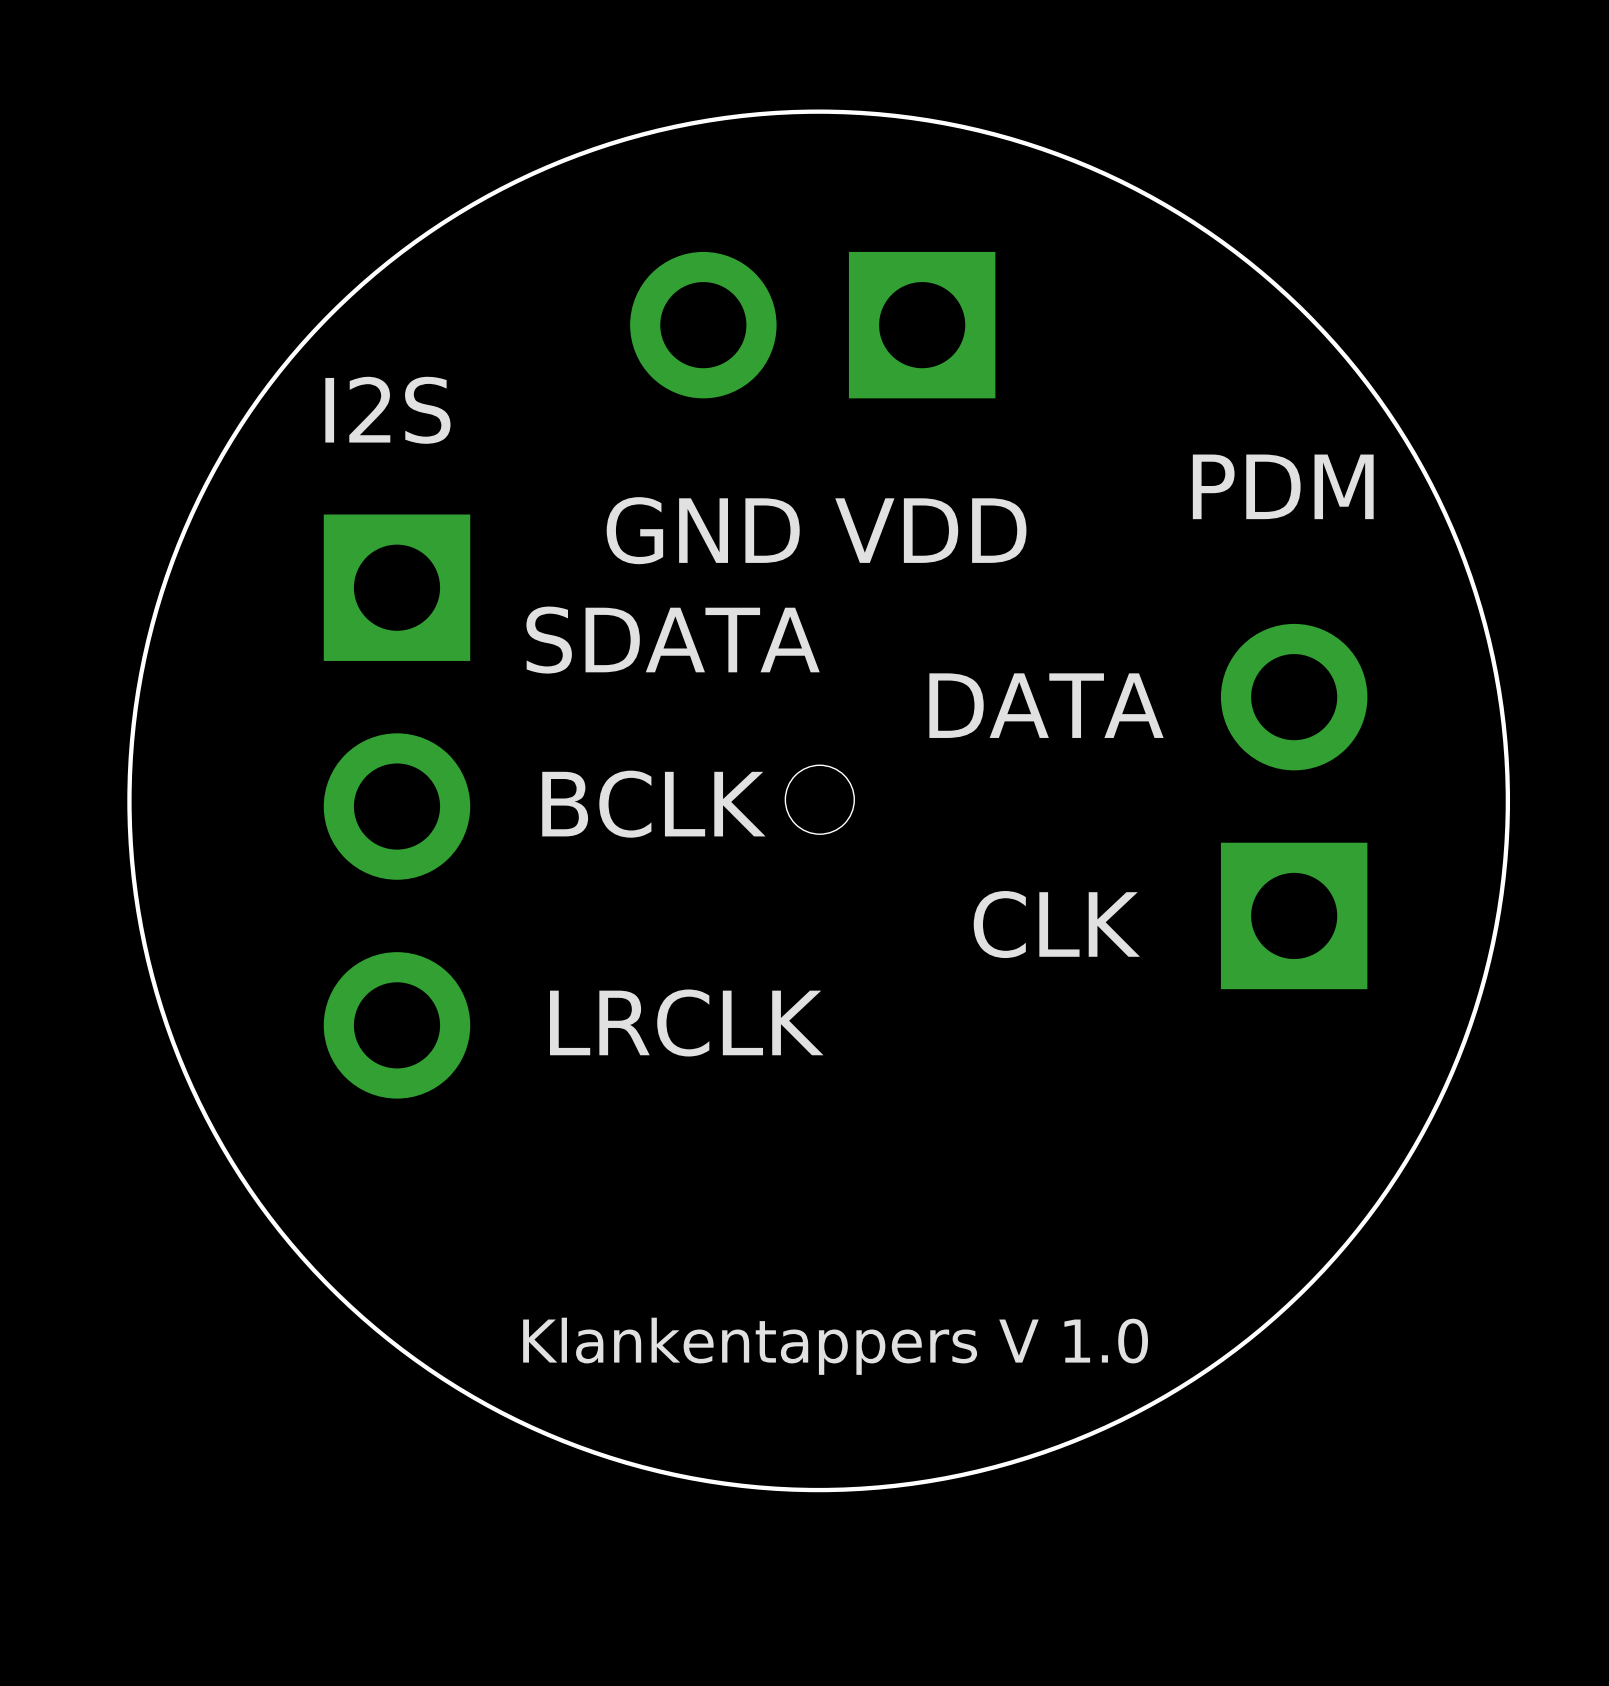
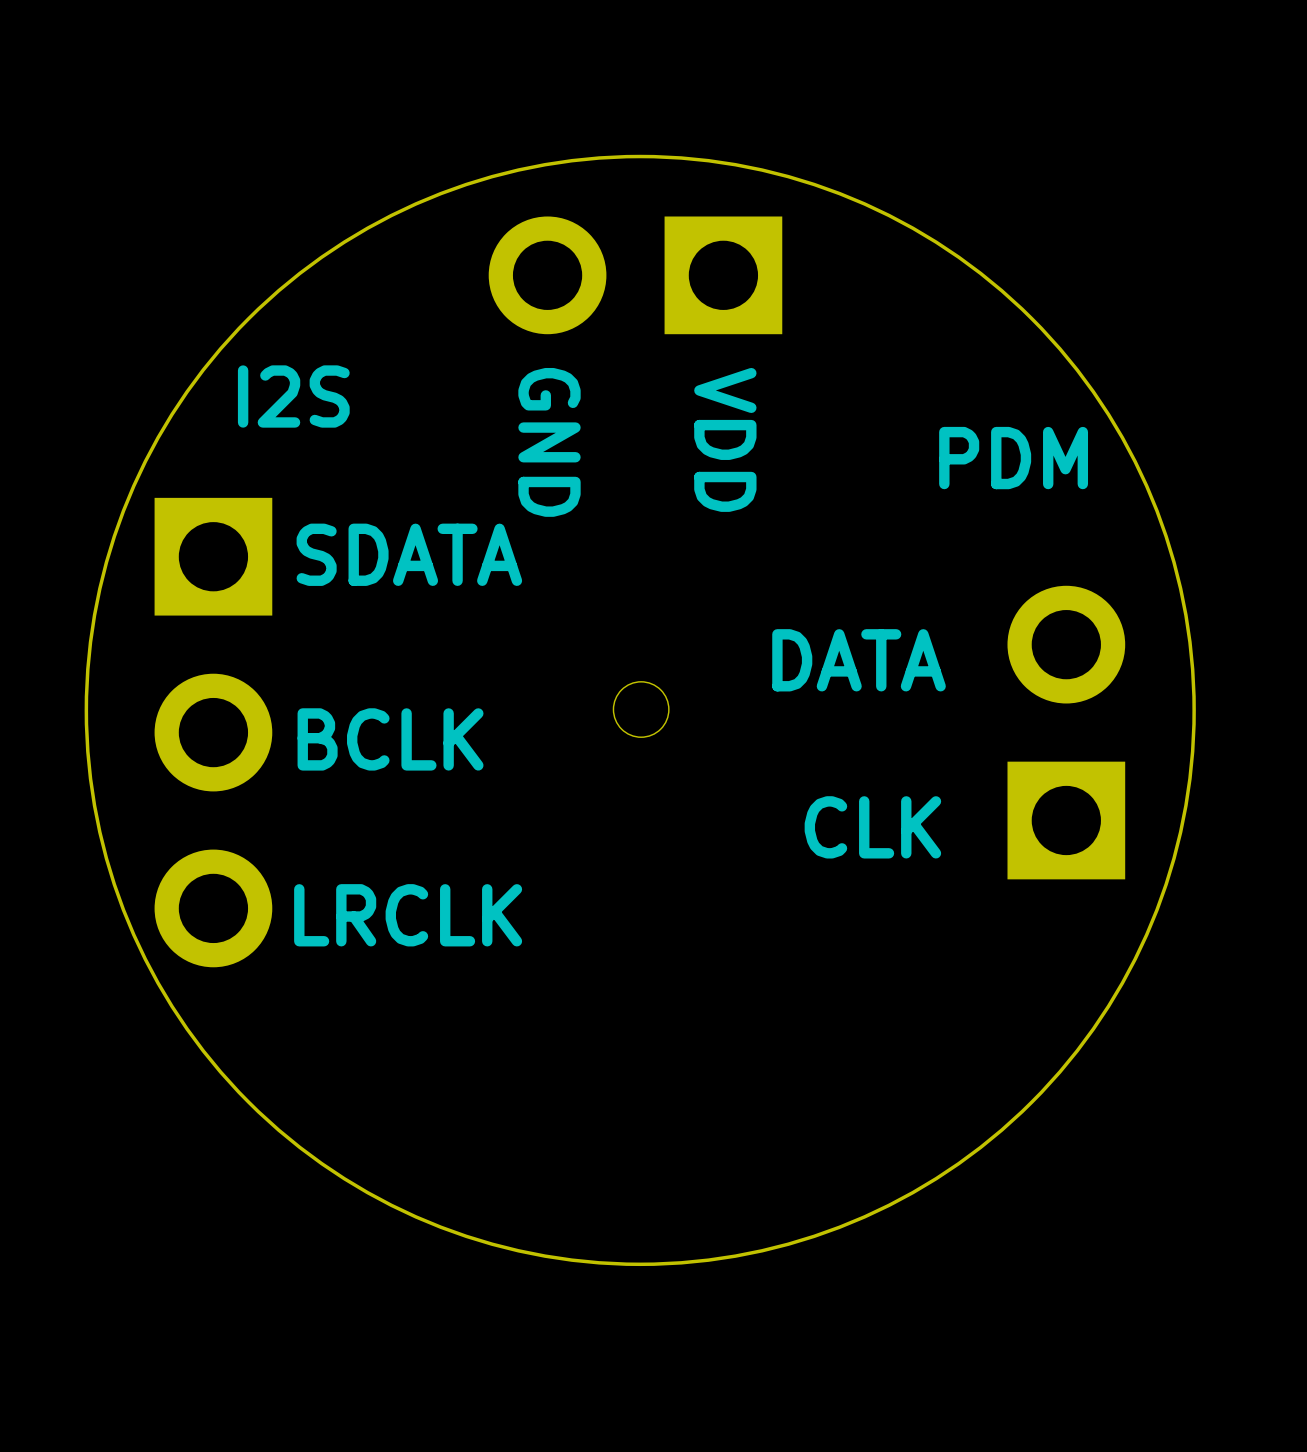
part position: (812, 325) -> (635, 275)
text rotation: 0° (703, 530) -> 90° clockwise (549, 442)
text rotation: 0° (930, 530) -> 90° clockwise (725, 439)
text position: SDATA (673, 640) -> SDATA (409, 554)
text position: DATA (1046, 705) -> DATA (859, 660)
text position: BCLK (653, 804) -> BCLK (390, 739)
part position: (396, 806) -> (213, 732)
part position: (1294, 806) -> (1066, 732)
text position: CLK (1056, 924) -> CLK (872, 827)
text position: LRCLK (686, 1023) -> LRCLK (408, 915)
text: Klankentappers V 1.0 (835, 1346) -> none

